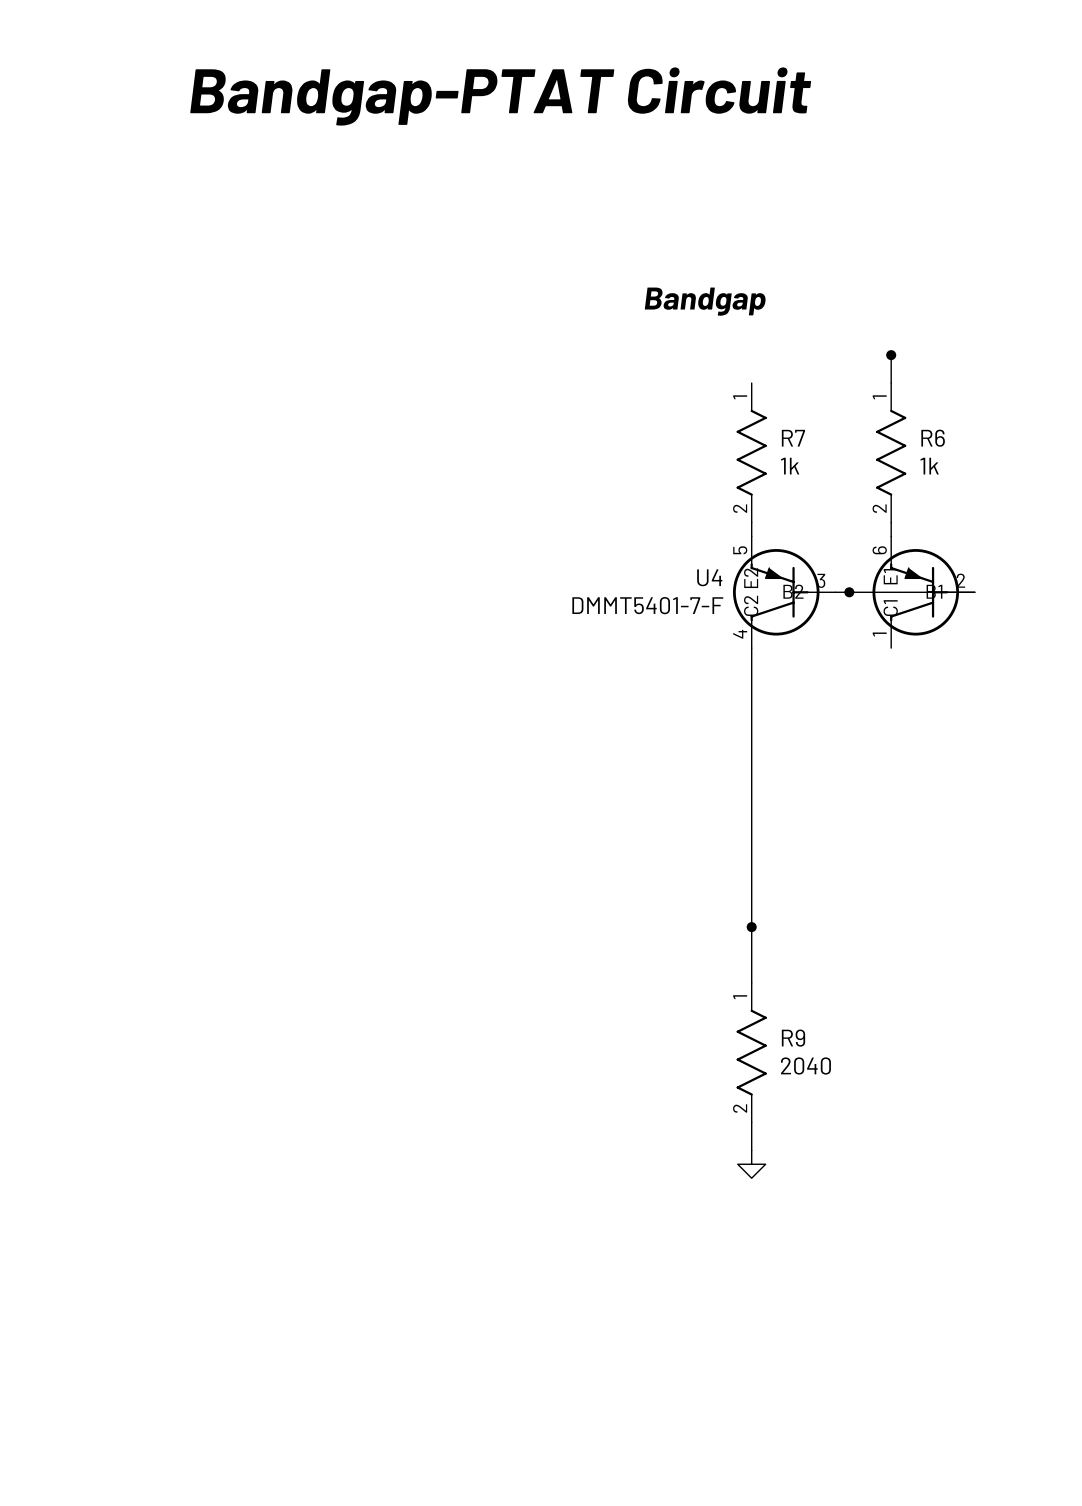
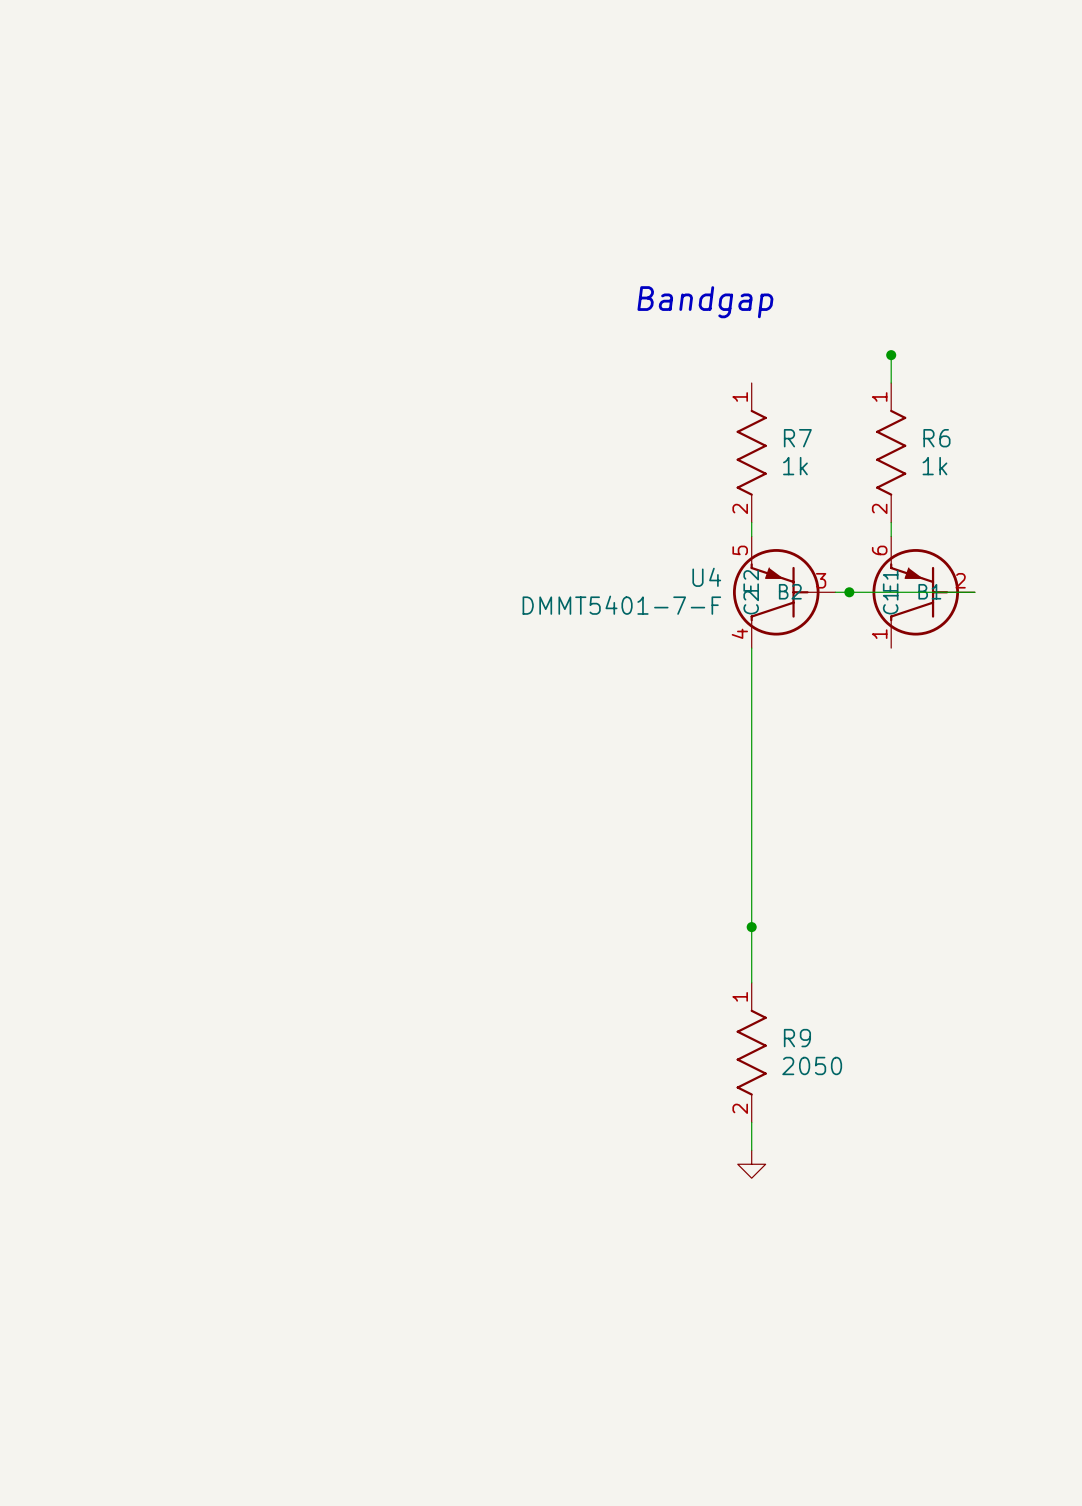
text: Bandgap-PTAT Circuit (500, 96) -> none
R9 value: 2040 (805, 1065) -> 2050 (812, 1065)

